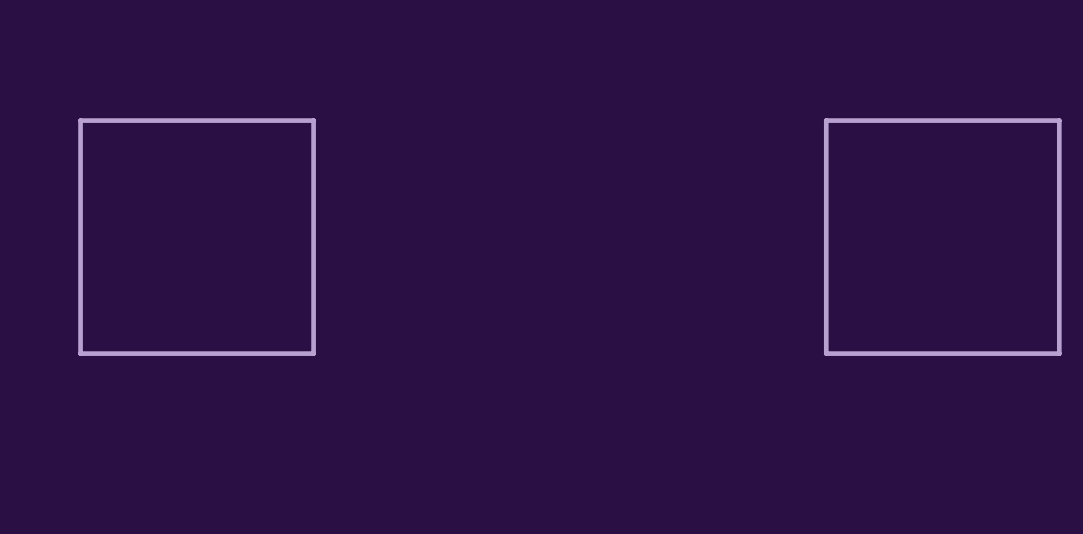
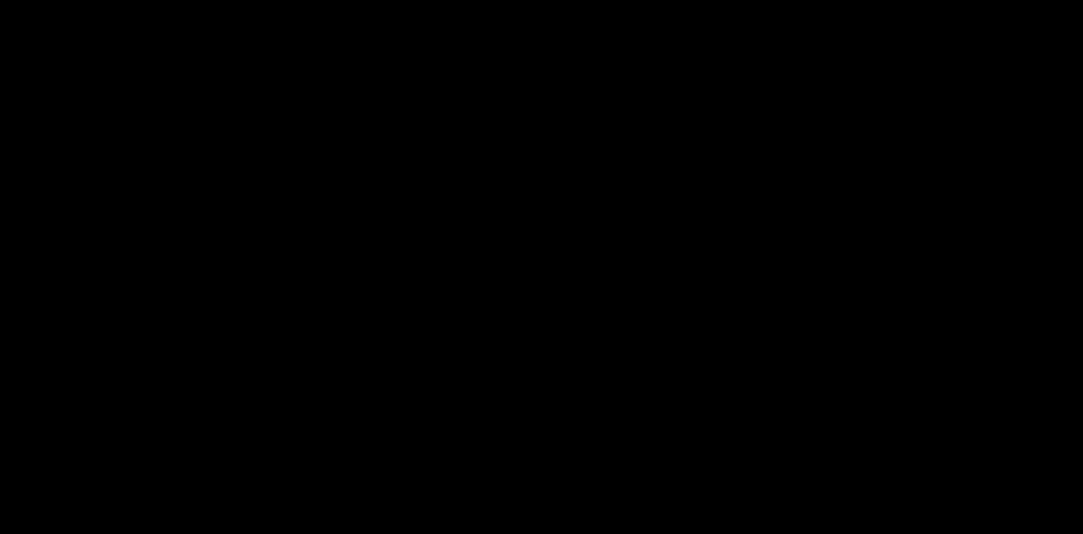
line: (80, 120) (313, 120) (313, 353) (80, 353) (80, 120) -> none
line: (826, 120) (1059, 120) (1059, 353) (826, 353) (826, 120) -> none

